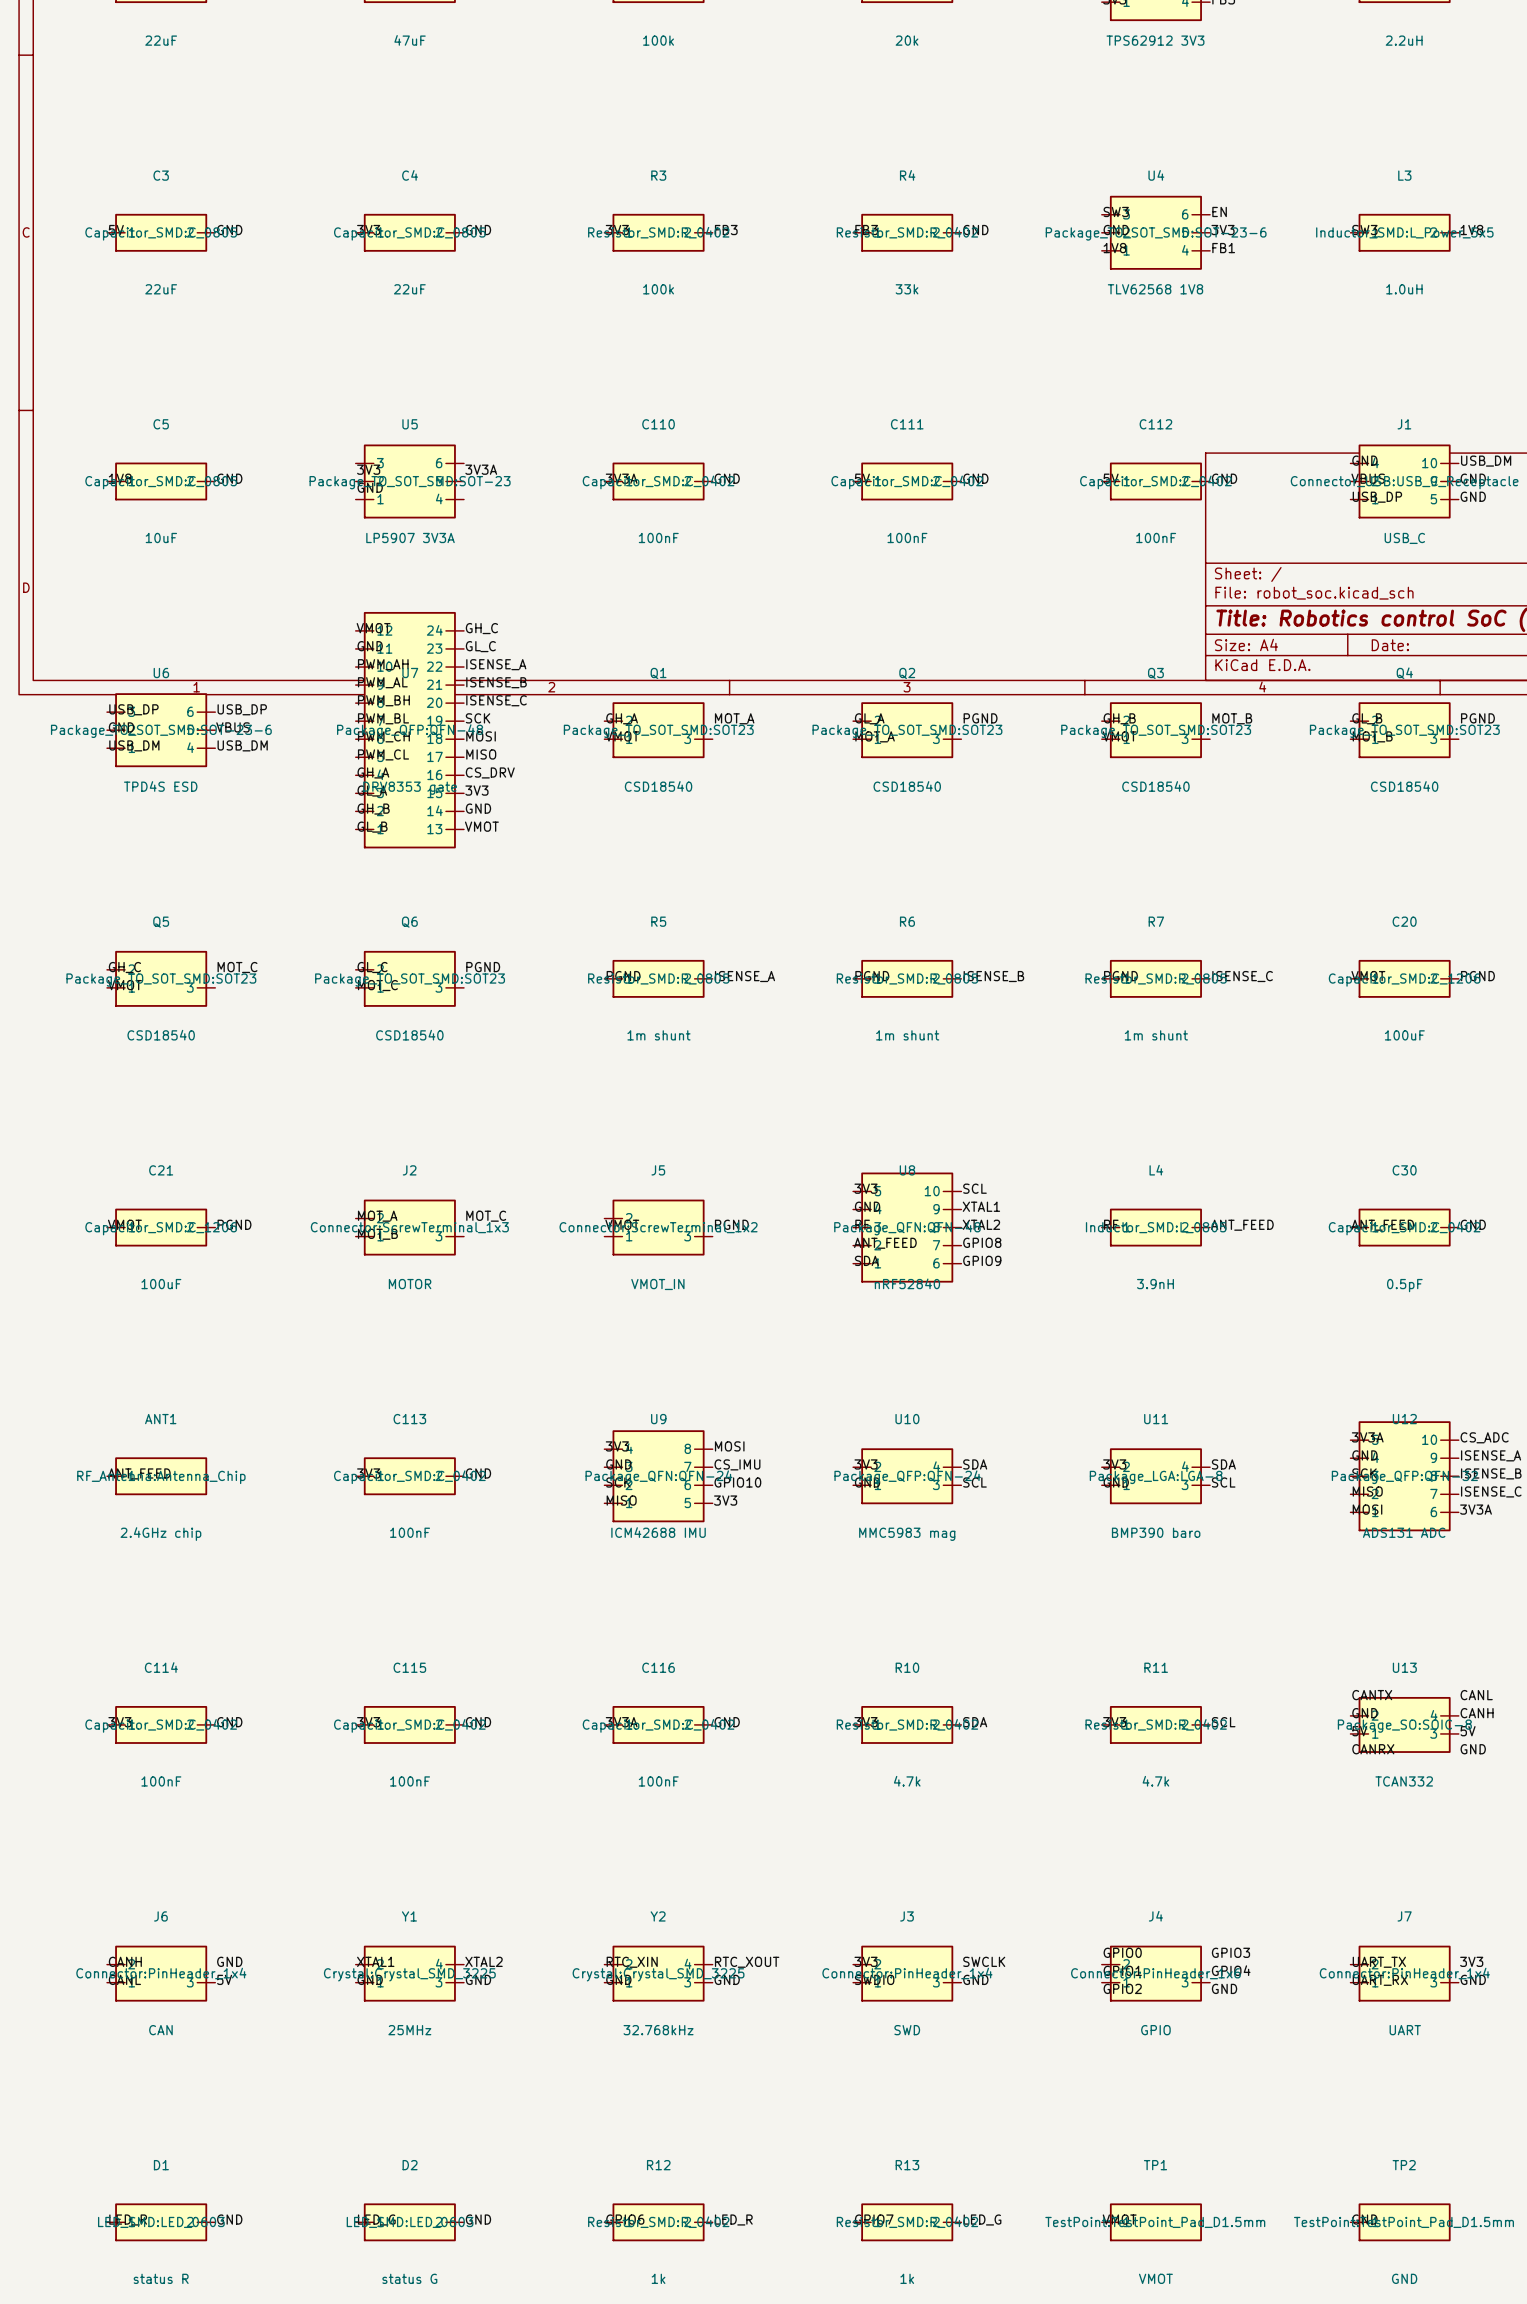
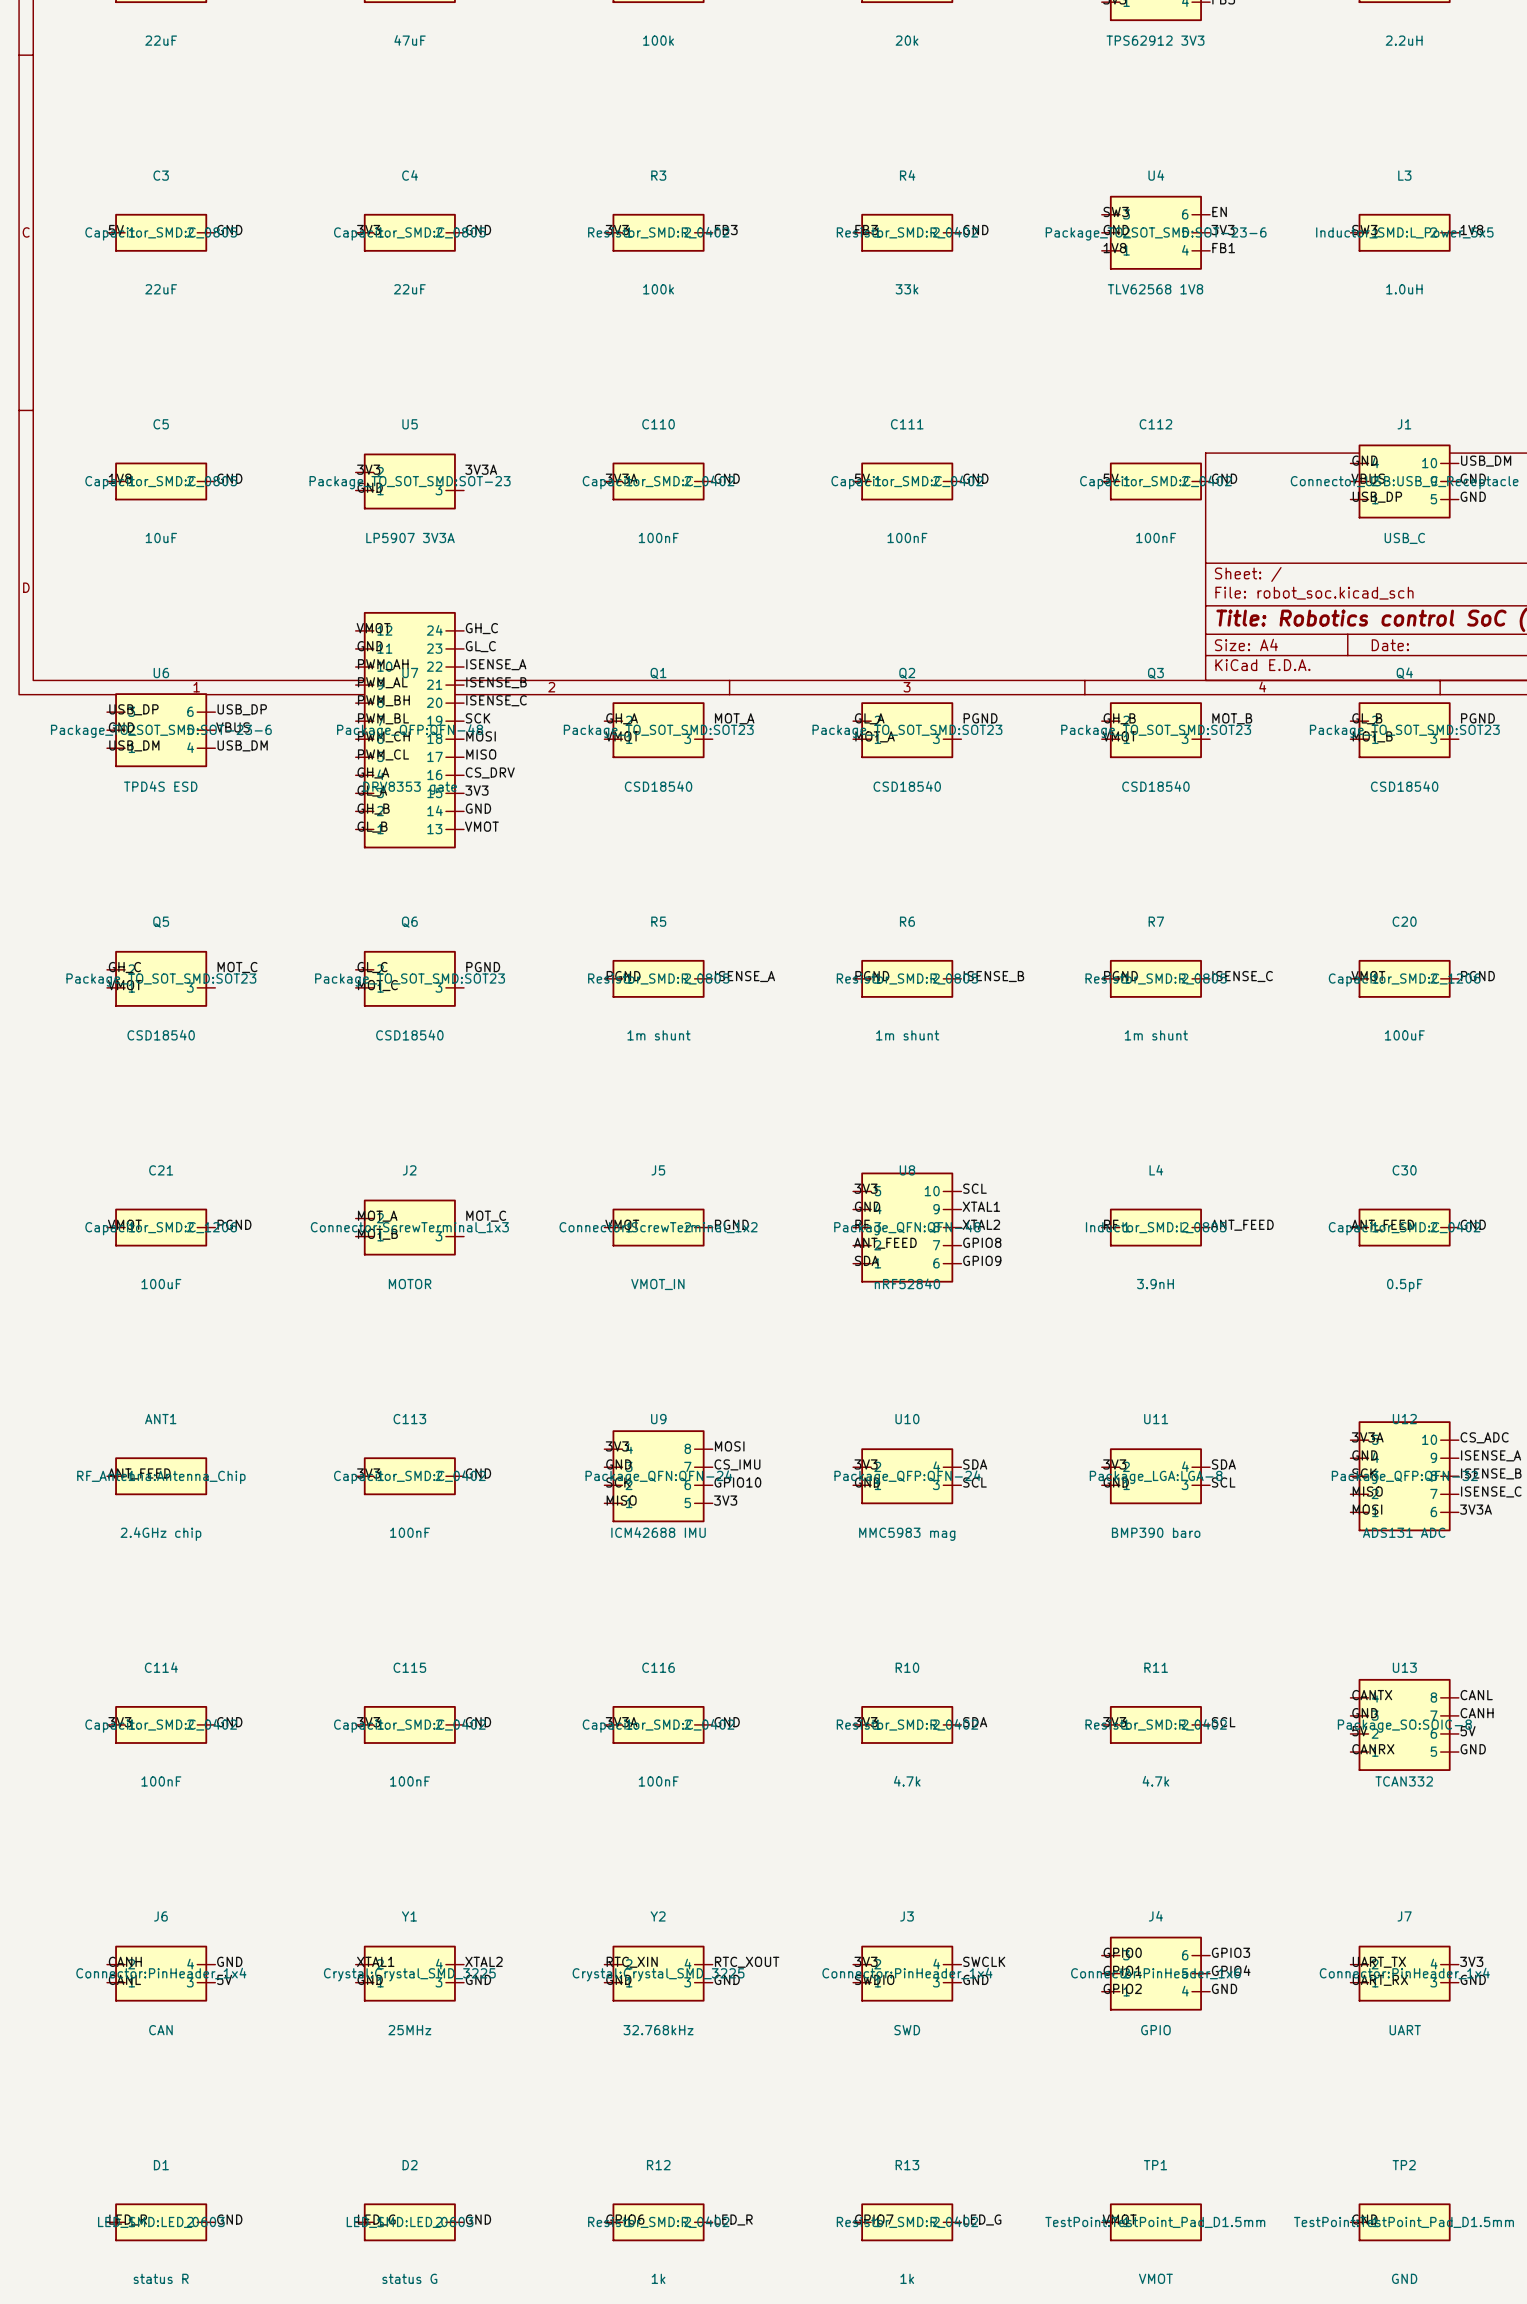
U5 symbol: [355, 444, 464, 519] -> [355, 453, 464, 510]
J5 symbol: [604, 1199, 713, 1256] -> [604, 1208, 713, 1247]
U13 symbol: [1350, 1696, 1459, 1753] -> [1350, 1678, 1459, 1771]
J6 symbol: [107, 1945, 216, 2002] -> [107, 1945, 216, 2002]
J3 symbol: [853, 1945, 962, 2002] -> [853, 1945, 962, 2002]
J4 symbol: [1101, 1945, 1211, 2002] -> [1101, 1936, 1211, 2011]
J7 symbol: [1350, 1945, 1459, 2002] -> [1350, 1945, 1459, 2002]

